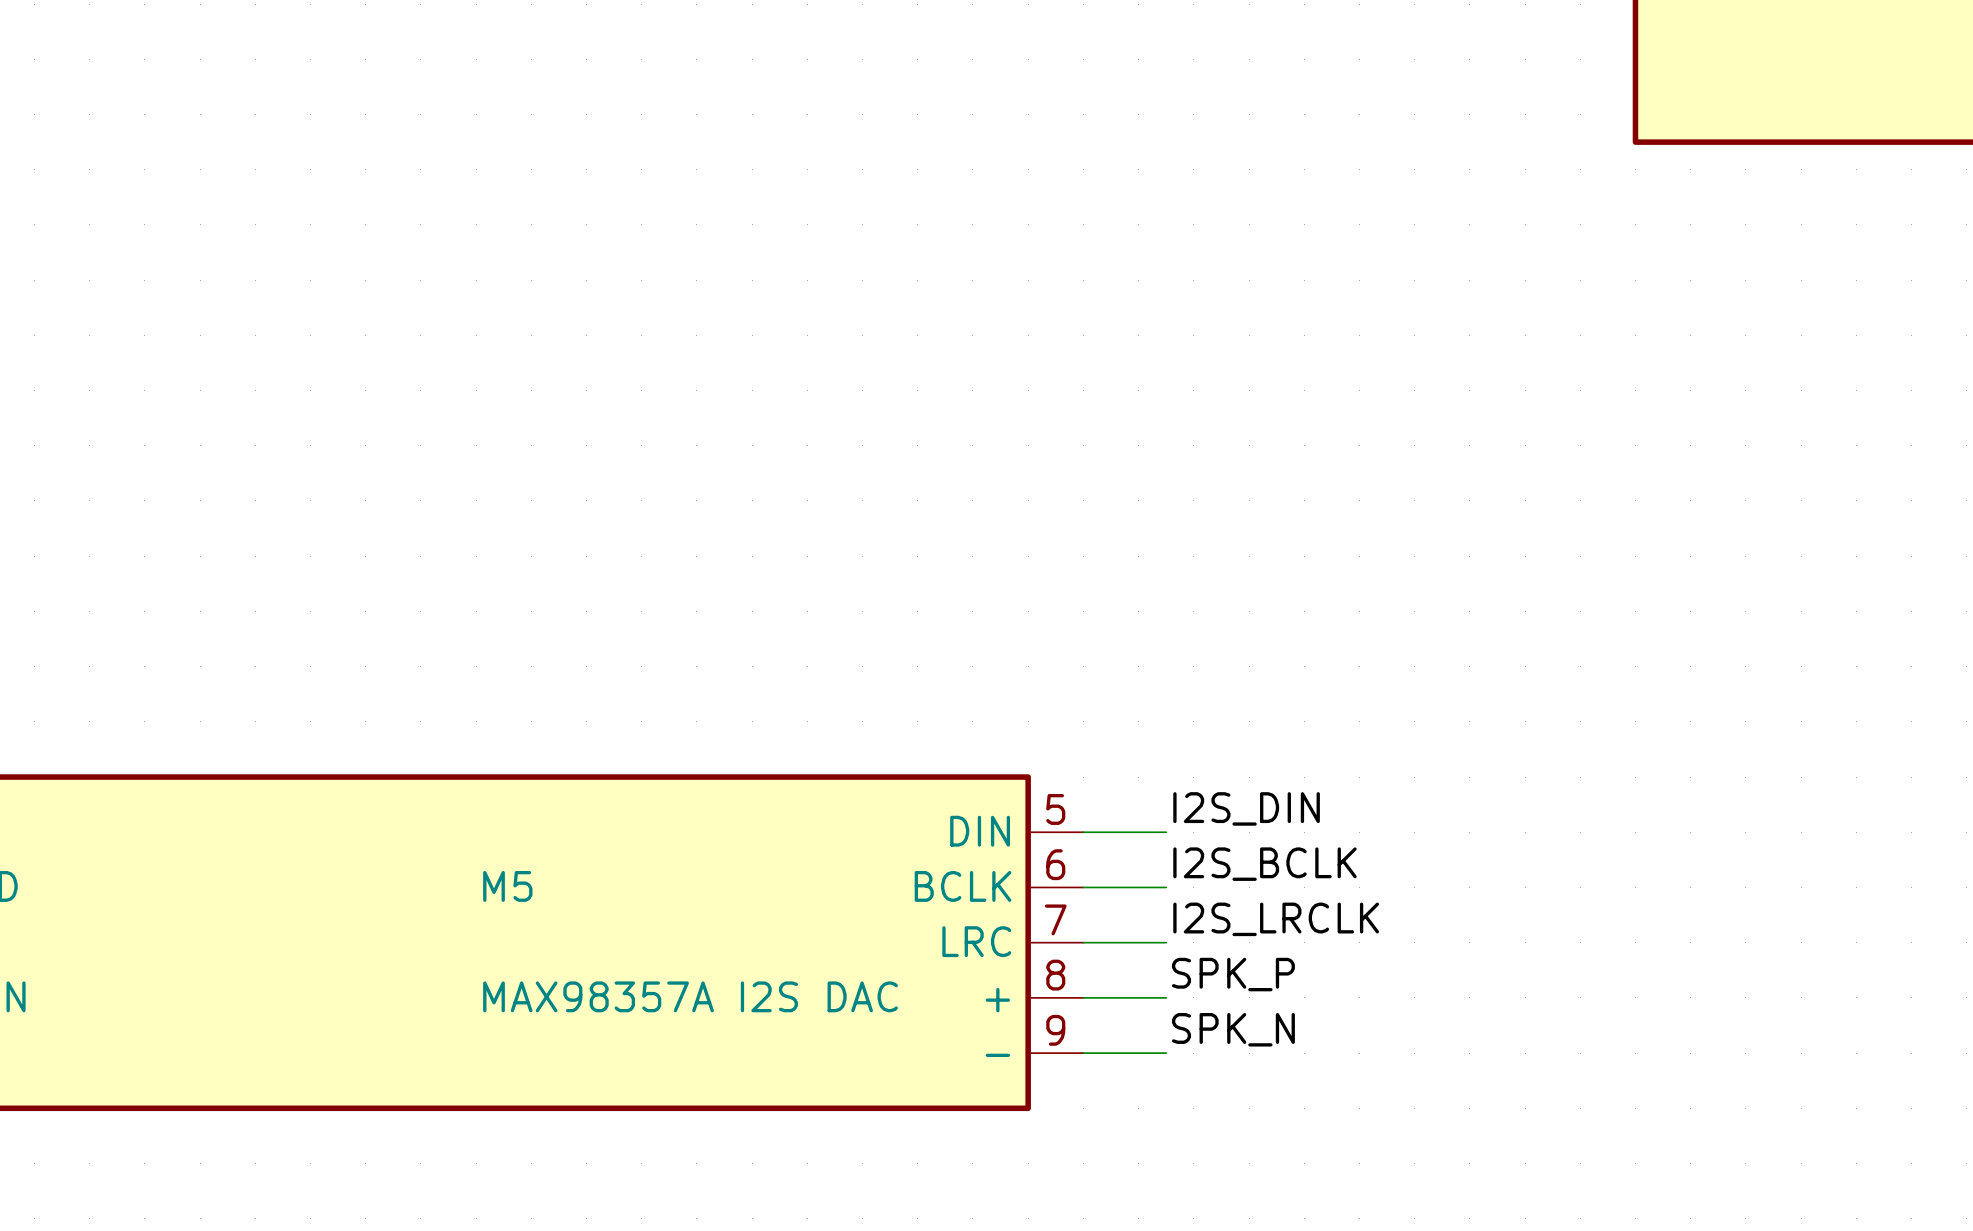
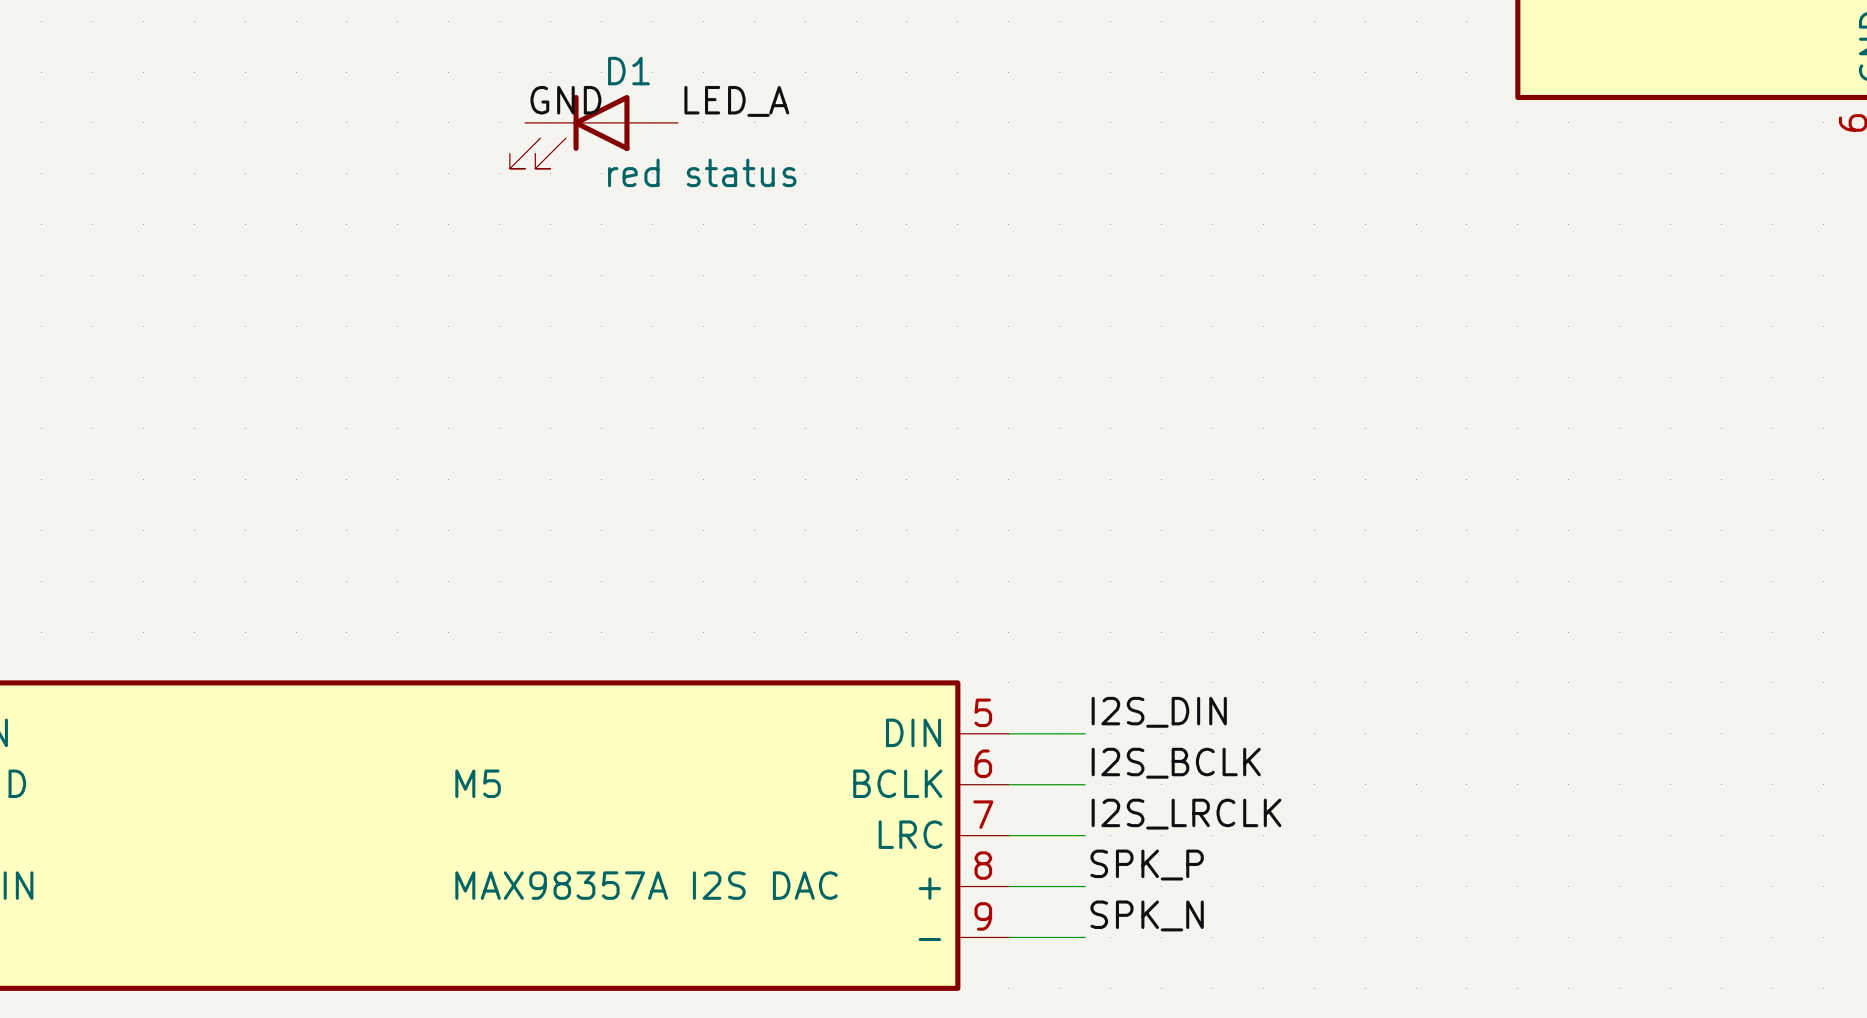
label: none -> GND (565, 100)
label: none -> LED_A (736, 101)
D1: none -> red status (593, 131)

